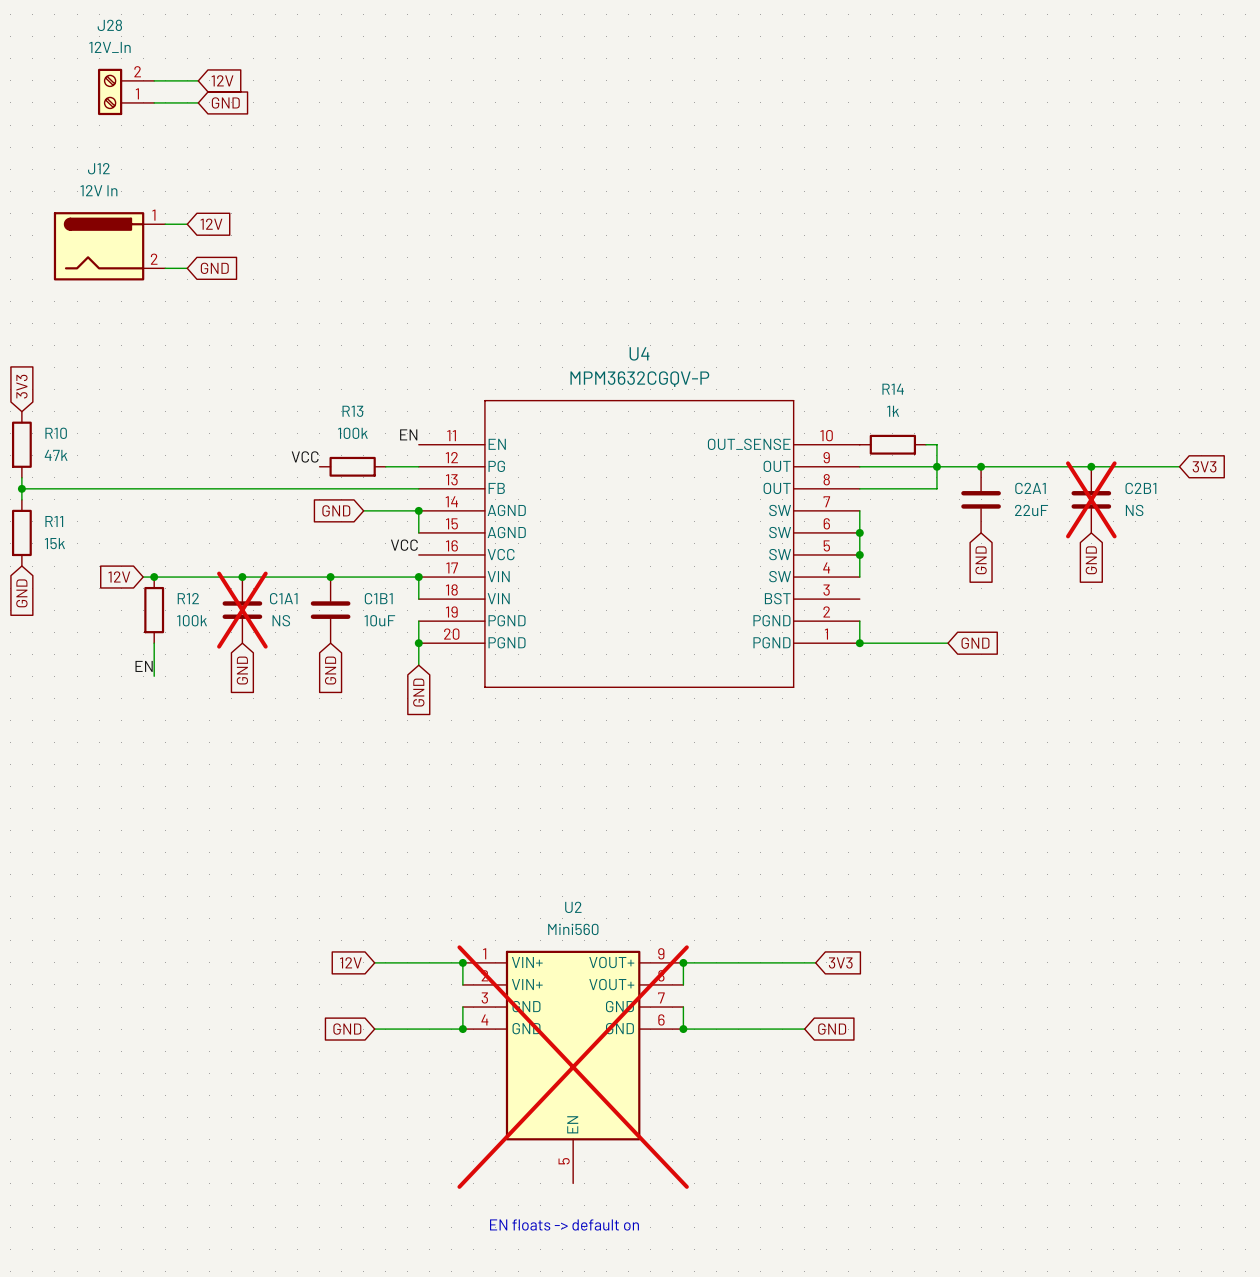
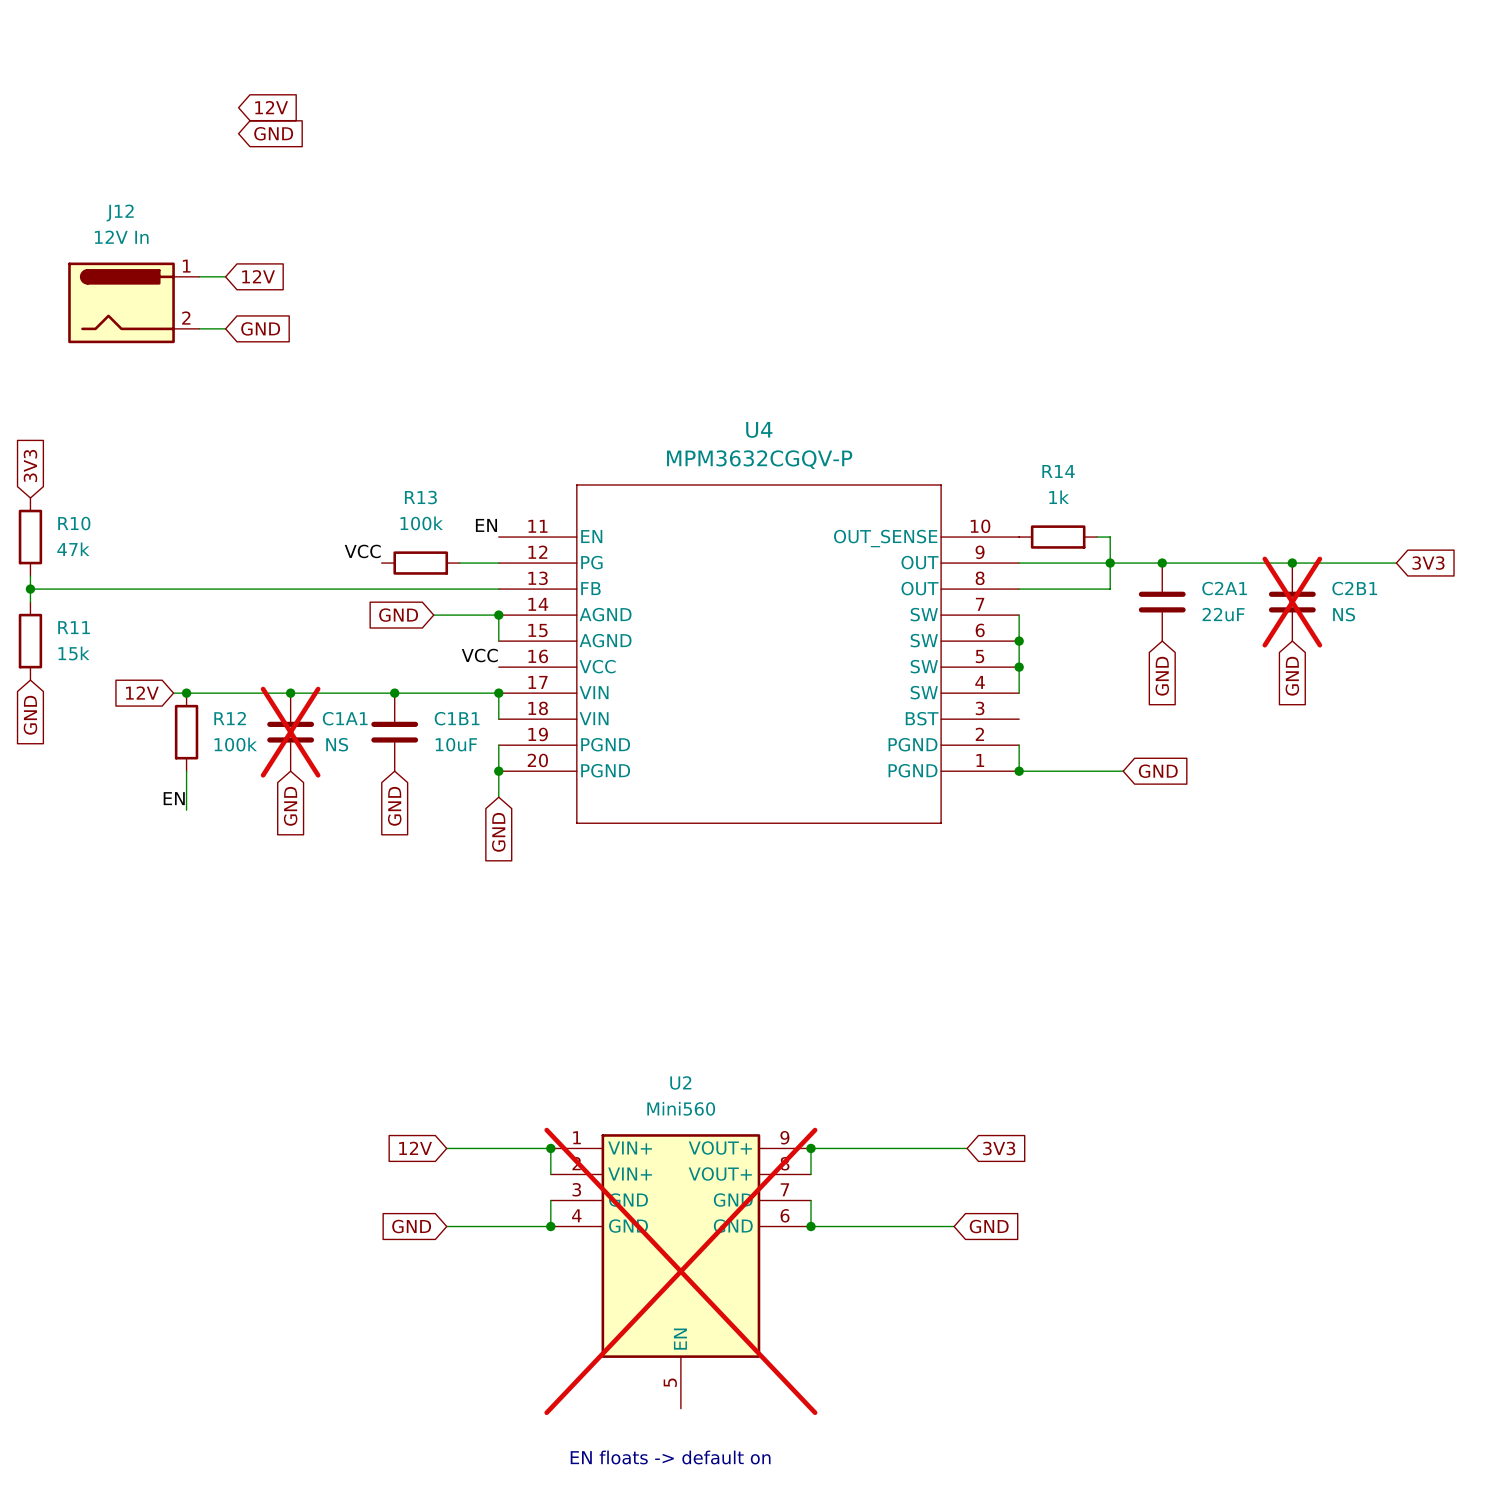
wire: (154, 80) (198, 80) -> none
J28: 12V_In (126, 91) -> none
wire: (154, 102) (198, 102) -> none

